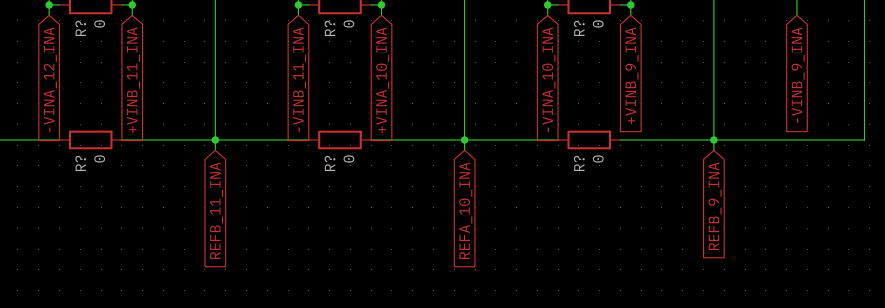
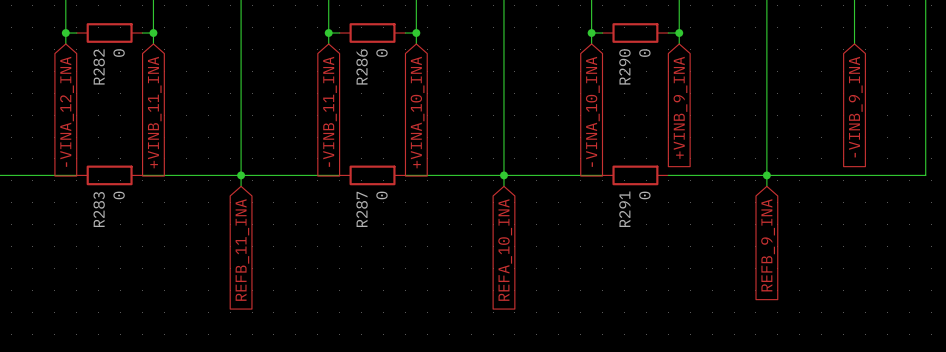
R? name: R? (80, 28) -> R282 (99, 66)
R? name: R? (330, 28) -> R286 (362, 66)
R? name: R? (579, 28) -> R290 (624, 66)
R? name: R? (80, 163) -> R283 (99, 209)
R? name: R? (330, 163) -> R287 (362, 209)
R? name: R? (579, 163) -> R291 (624, 209)

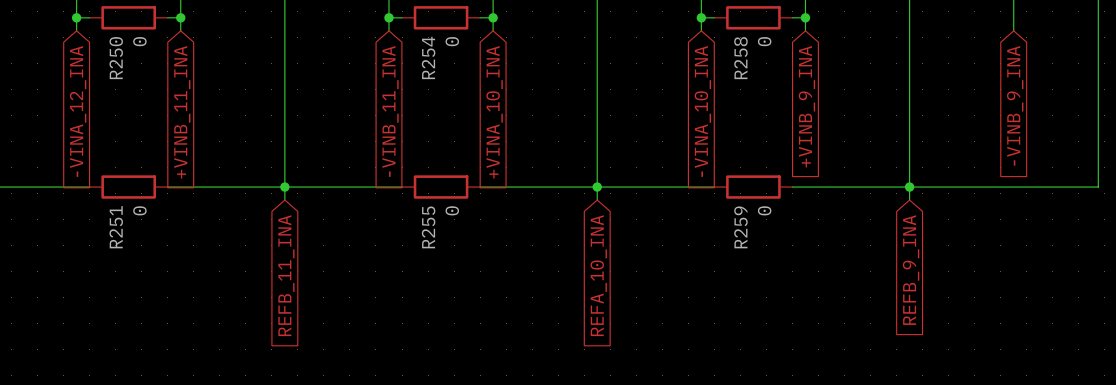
R282 name: R282 (99, 66) -> R250 (116, 58)
R286 name: R286 (362, 66) -> R254 (428, 57)
R290 name: R290 (624, 66) -> R258 (740, 58)
R283 name: R283 (99, 209) -> R251 (116, 227)
R287 name: R287 (362, 209) -> R255 (428, 227)
R291 name: R291 (624, 209) -> R259 (740, 227)

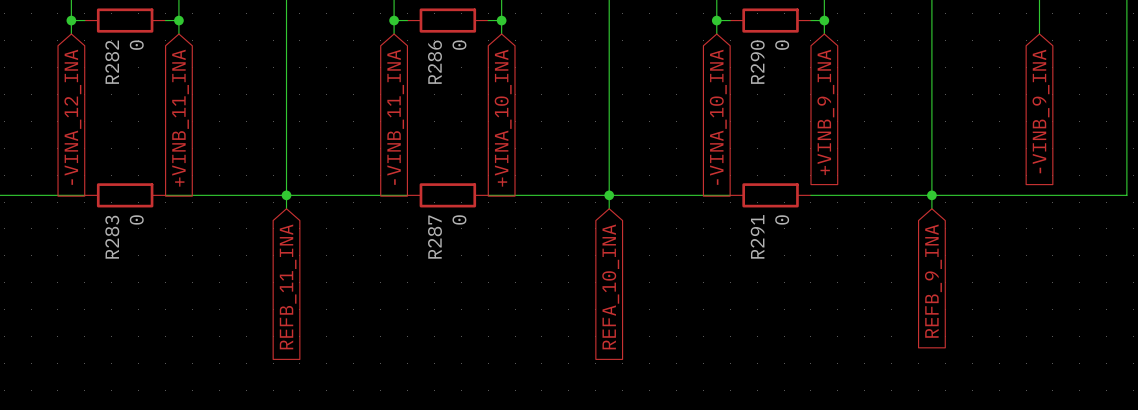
R254 name: R254 (428, 57) -> R286 (434, 62)
R250 name: R250 (116, 58) -> R282 (112, 62)
R258 name: R258 (740, 58) -> R290 (757, 62)
R251 name: R251 (116, 227) -> R283 (112, 237)
R255 name: R255 (428, 227) -> R287 (434, 237)
R259 name: R259 (740, 227) -> R291 (757, 236)

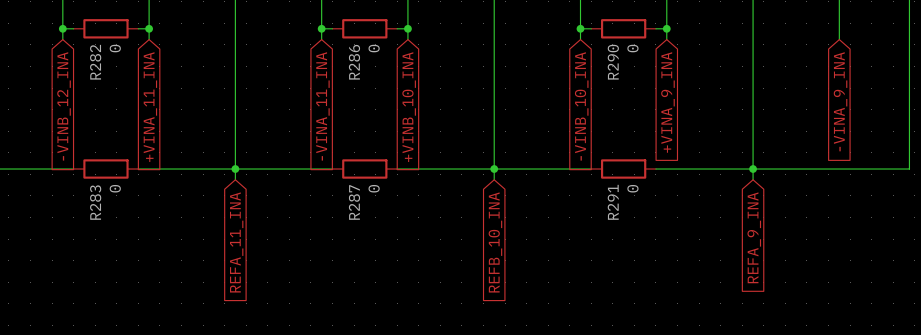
global label: -VINB_9_INA (1041, 111) -> -VINA_9_INA (840, 101)
global label: +VINB_9_INA (825, 112) -> +VINA_9_INA (667, 102)
global label: -VINA_12_INA (72, 117) -> -VINB_12_INA (64, 106)
global label: -VINB_11_INA (395, 117) -> -VINA_11_INA (322, 106)
global label: -VINA_10_INA (718, 117) -> -VINB_10_INA (581, 106)
global label: +VINB_11_INA (180, 118) -> +VINA_11_INA (150, 107)
global label: +VINA_10_INA (503, 118) -> +VINB_10_INA (409, 107)
global label: REFB_9_INA (933, 281) -> REFA_9_INA (754, 237)
global label: REFB_11_INA (288, 286) -> REFA_11_INA (236, 242)
global label: REFA_10_INA (610, 286) -> REFB_10_INA (495, 242)

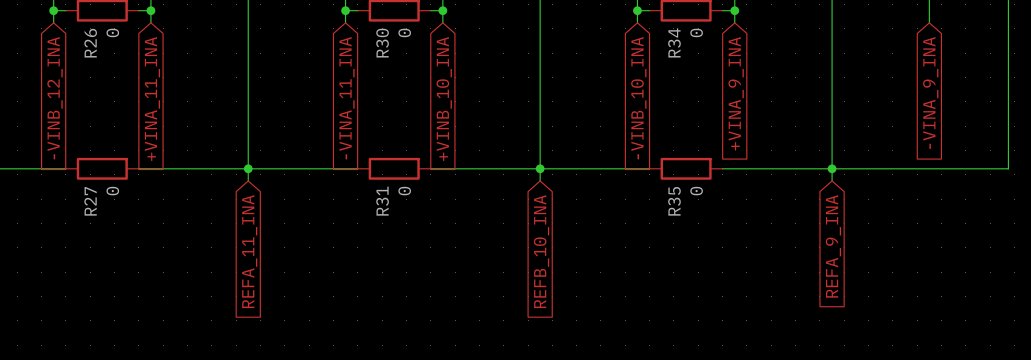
R282 name: R282 (95, 62) -> R26 (90, 43)
R286 name: R286 (354, 62) -> R30 (382, 43)
R290 name: R290 (613, 62) -> R34 (674, 42)
R283 name: R283 (95, 202) -> R27 (90, 201)
R287 name: R287 (354, 202) -> R31 (382, 201)
R291 name: R291 (613, 202) -> R35 (674, 201)

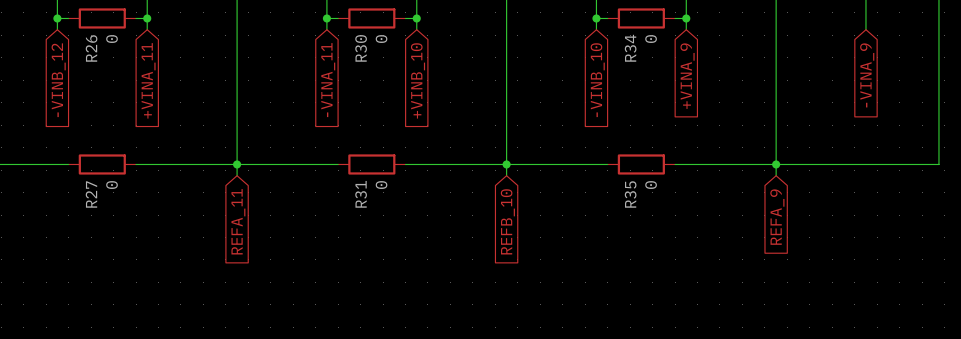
global label: -VINA_9_INA (930, 92) -> -VINA_9 (867, 75)
global label: +VINA_9_INA (736, 93) -> +VINA_9 (687, 76)
global label: -VINB_12_INA (55, 98) -> -VINB_12 (58, 80)
global label: +VINA_11_INA (152, 98) -> +VINA_11 (148, 80)
global label: -VINA_11_INA (347, 98) -> -VINA_11 (328, 80)
global label: +VINB_10_INA (444, 98) -> +VINB_10 (418, 80)
global label: -VINB_10_INA (638, 98) -> -VINB_10 (597, 80)
global label: REFA_9_INA (833, 246) -> REFA_9 (777, 217)
global label: REFA_11_INA (249, 251) -> REFA_11 (238, 221)
global label: REFB_10_INA (541, 251) -> REFB_10 (507, 221)

